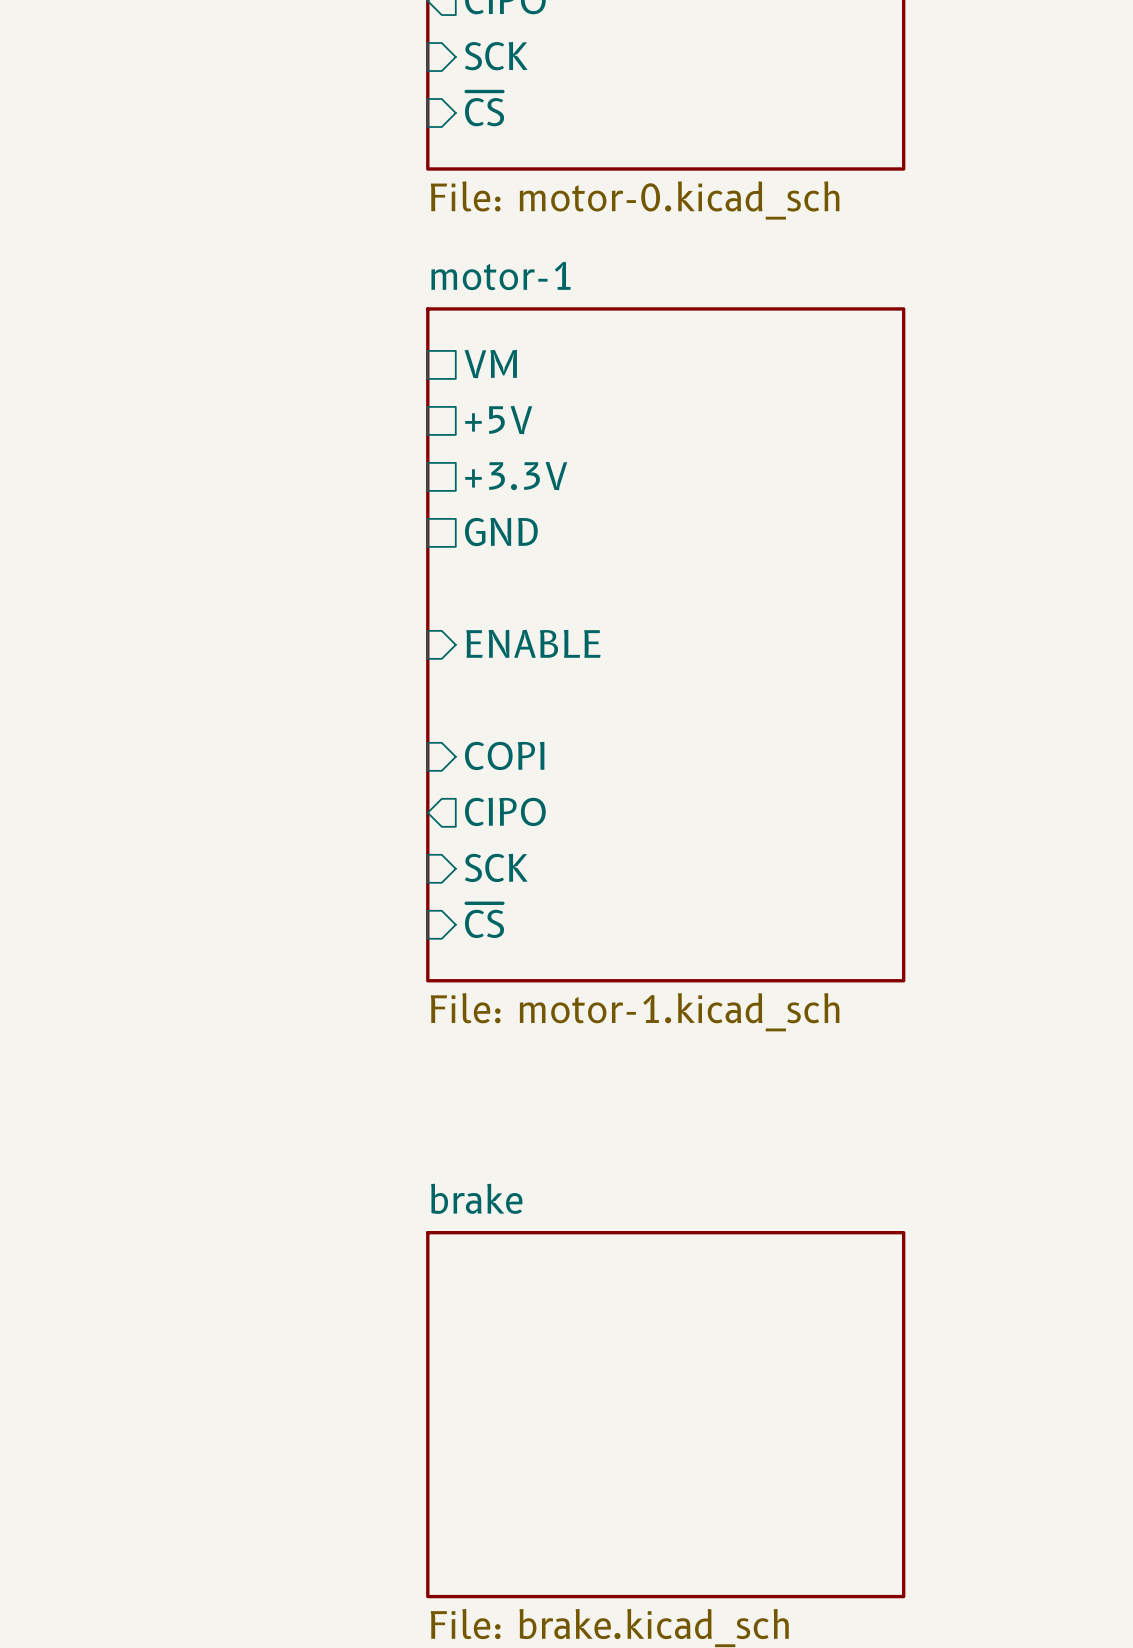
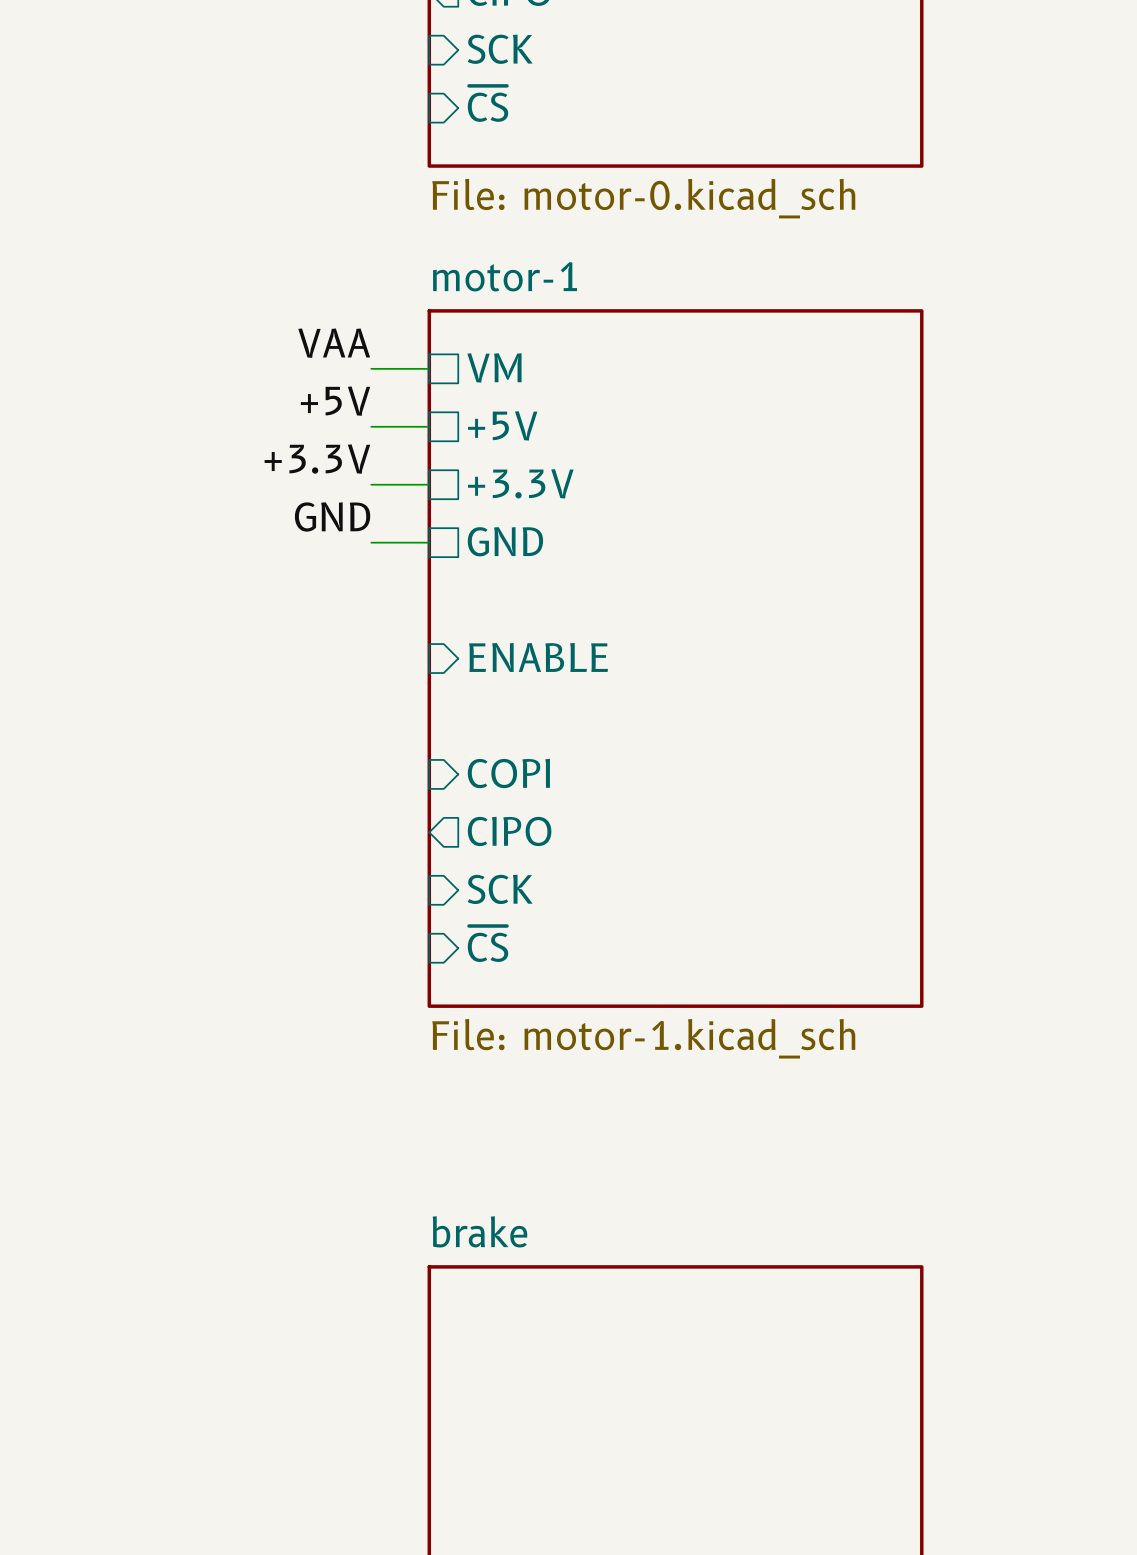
label: none -> VAA (334, 343)
wire: none -> (371, 368) (429, 368)
label: none -> +5V (335, 401)
wire: none -> (371, 426) (429, 426)
label: none -> +3.3V (317, 459)
wire: none -> (371, 484) (429, 484)
label: none -> GND (332, 516)
wire: none -> (371, 542) (429, 542)

